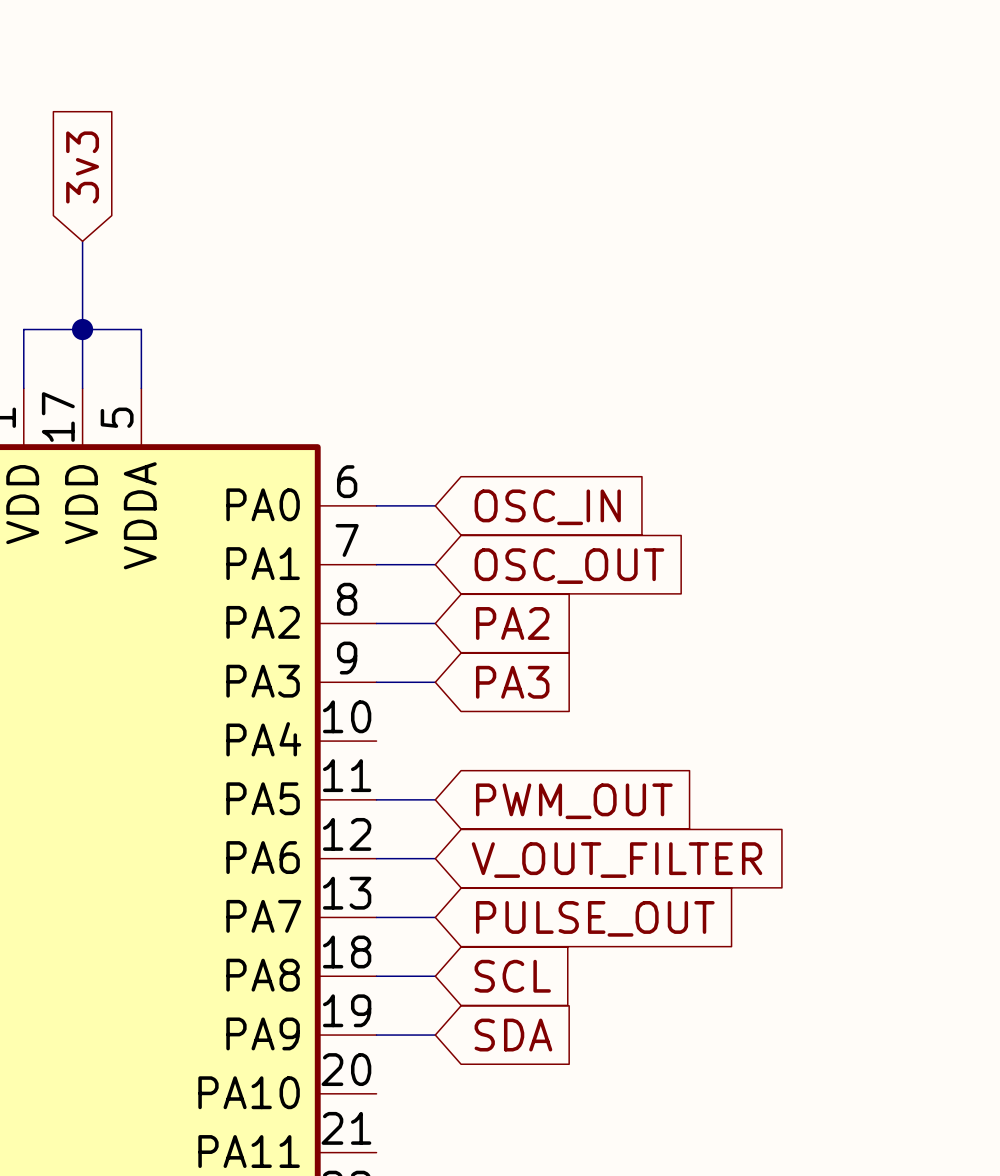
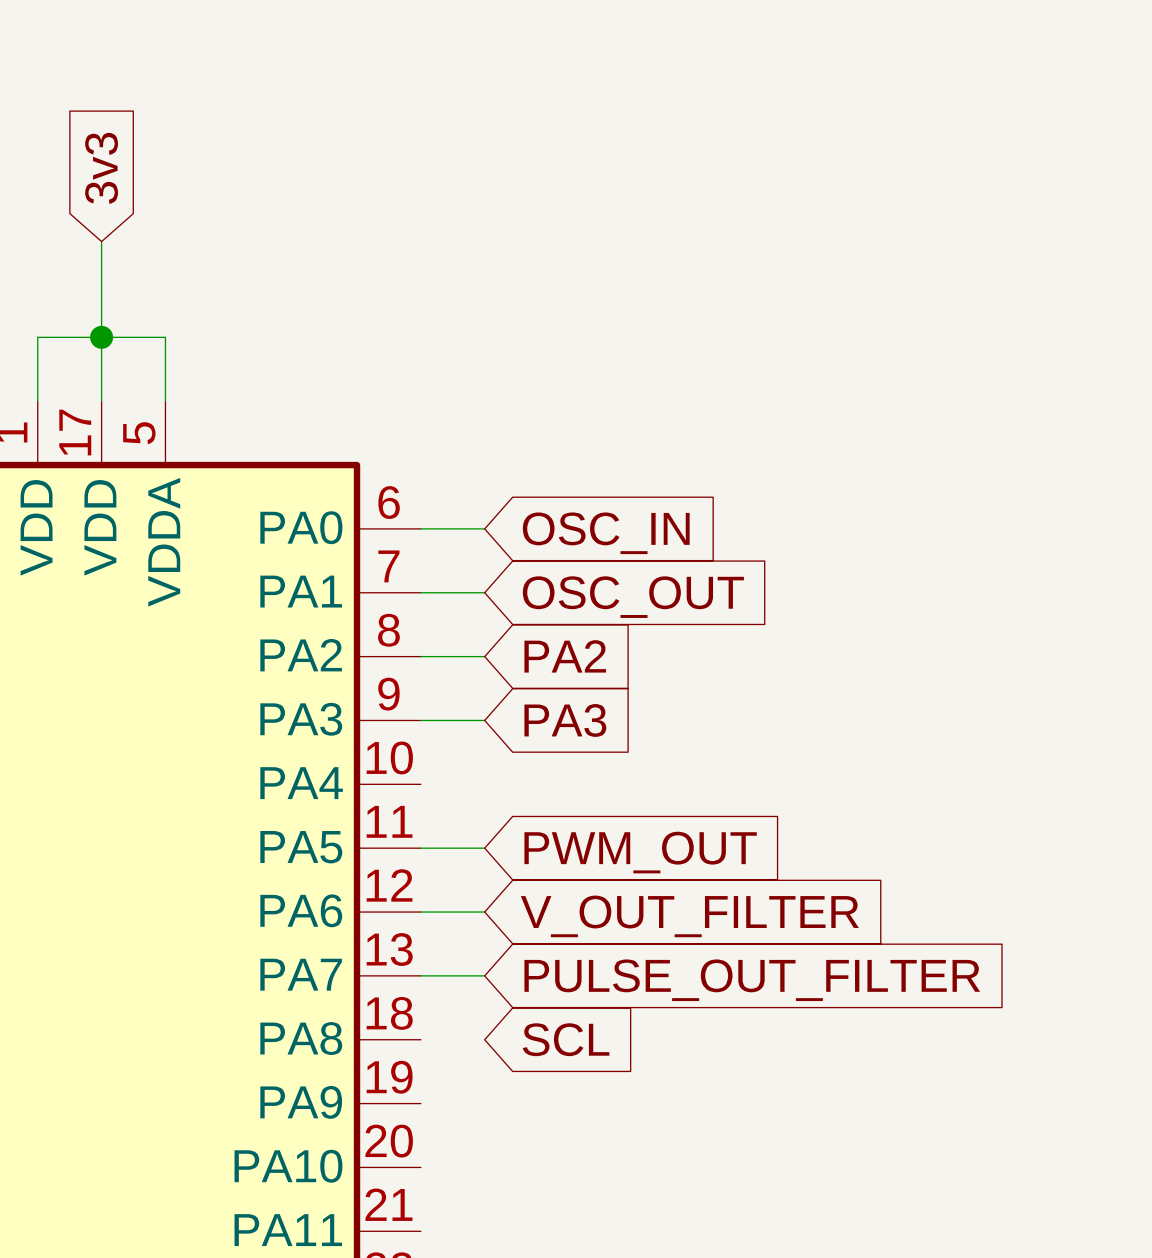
global label: PULSE_OUT (595, 918) -> PULSE_OUT_FILTER (752, 980)
wire: (376, 976) (435, 976) -> none
wire: (376, 1035) (435, 1035) -> none
global label: SDA (513, 1035) -> none

